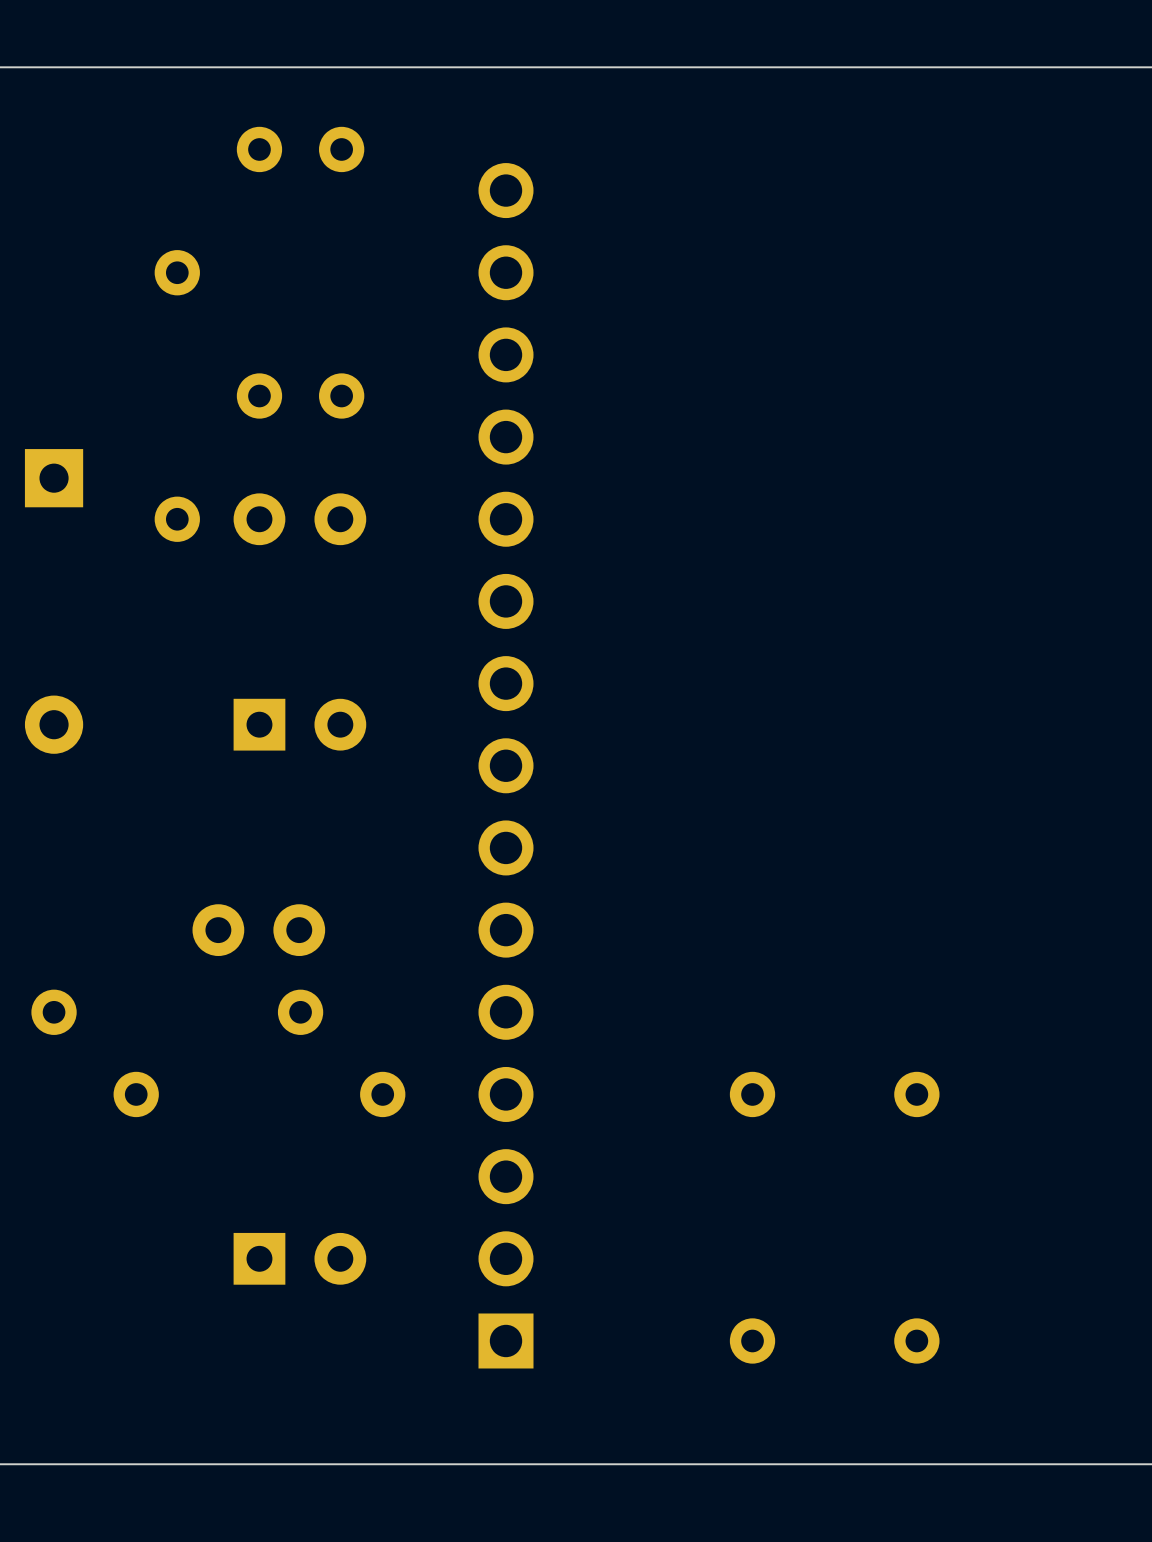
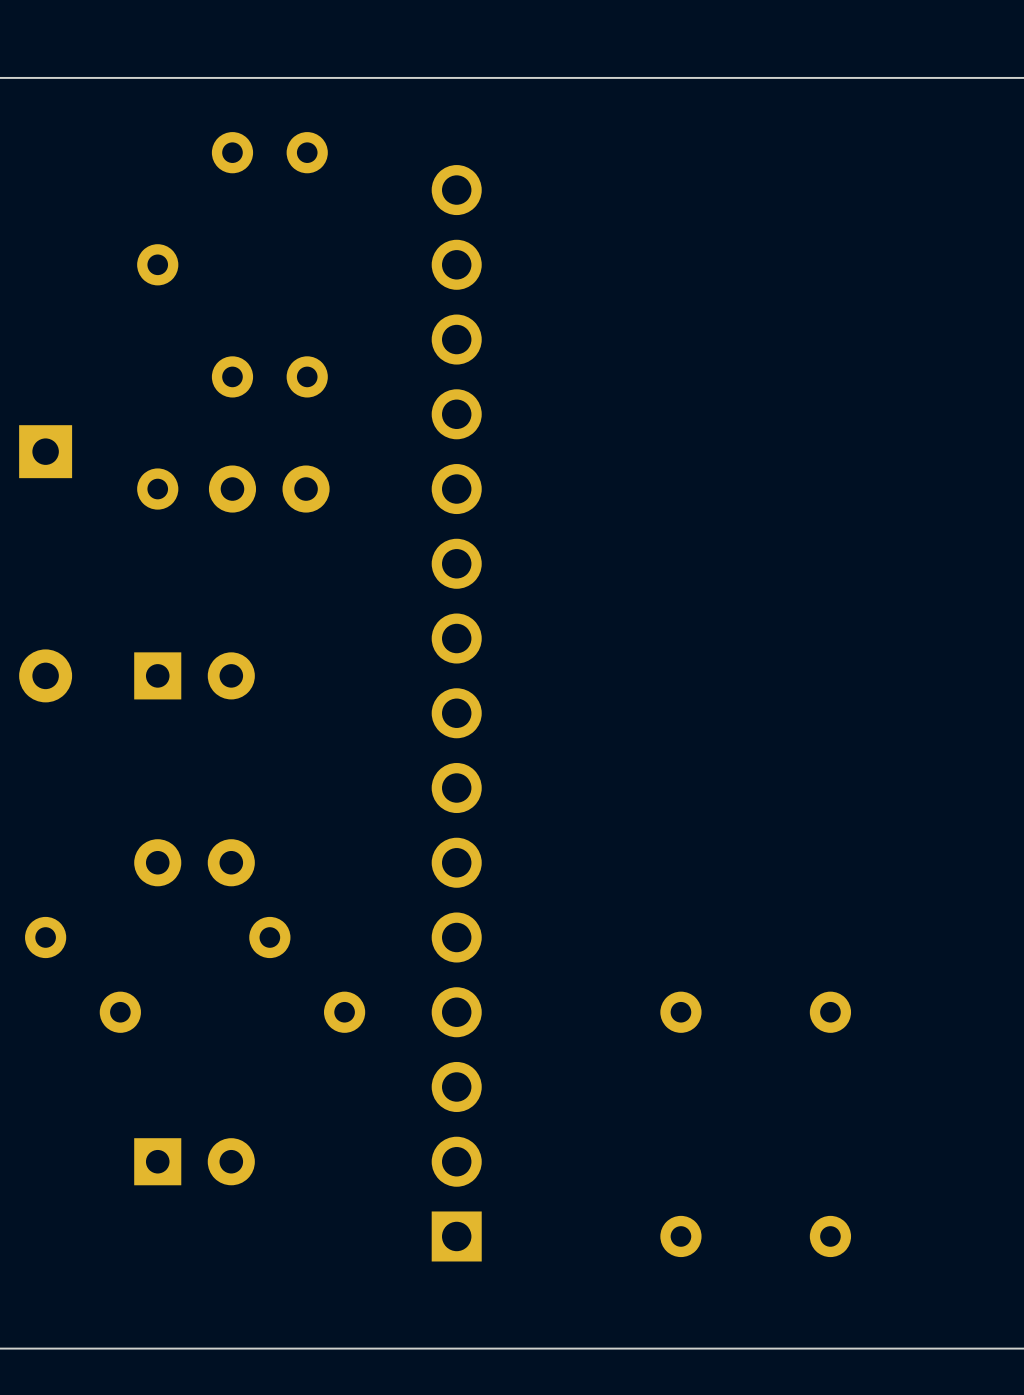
part position: (299, 724) -> (194, 675)
part position: (258, 930) -> (194, 862)
part position: (299, 1258) -> (194, 1161)

